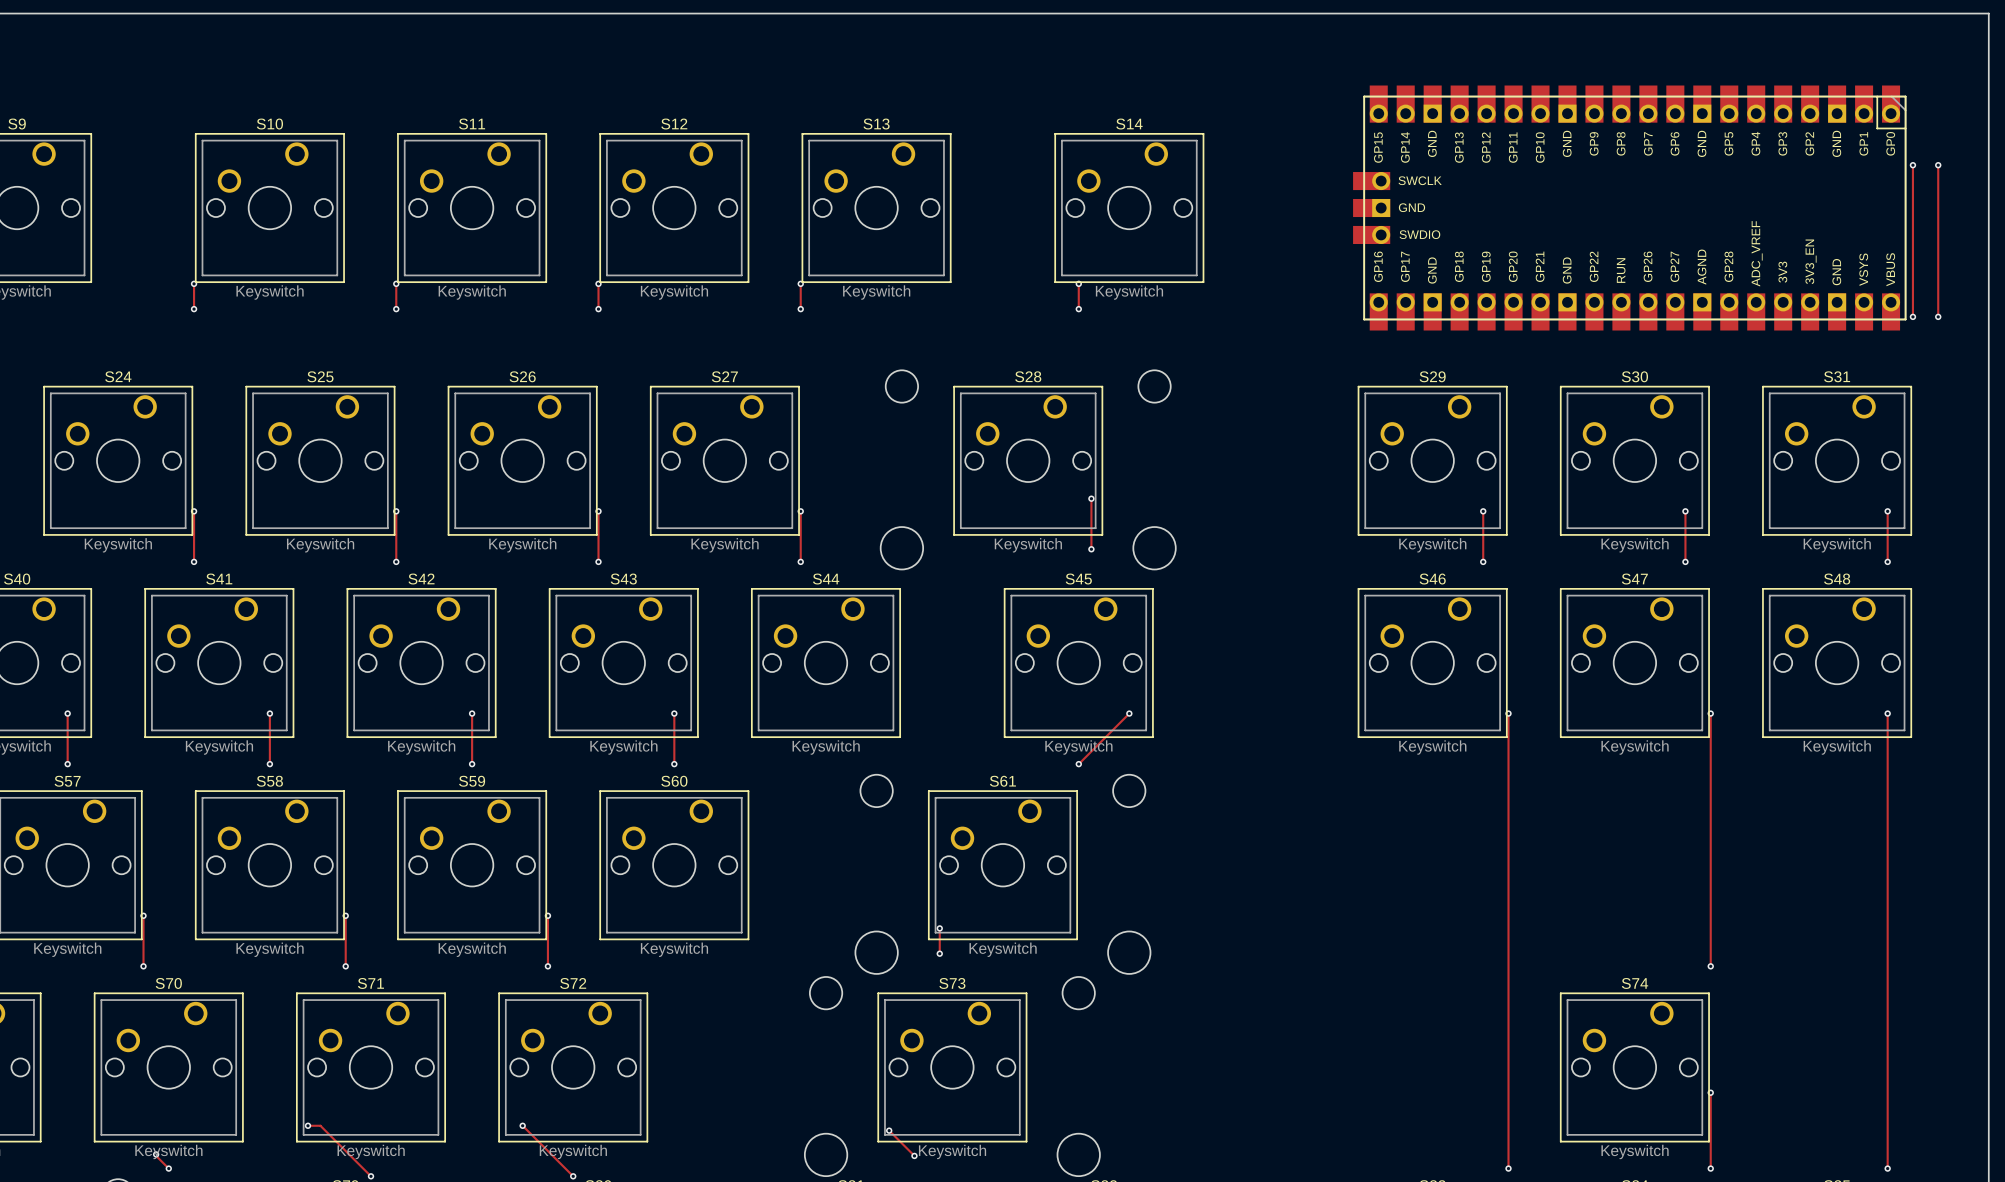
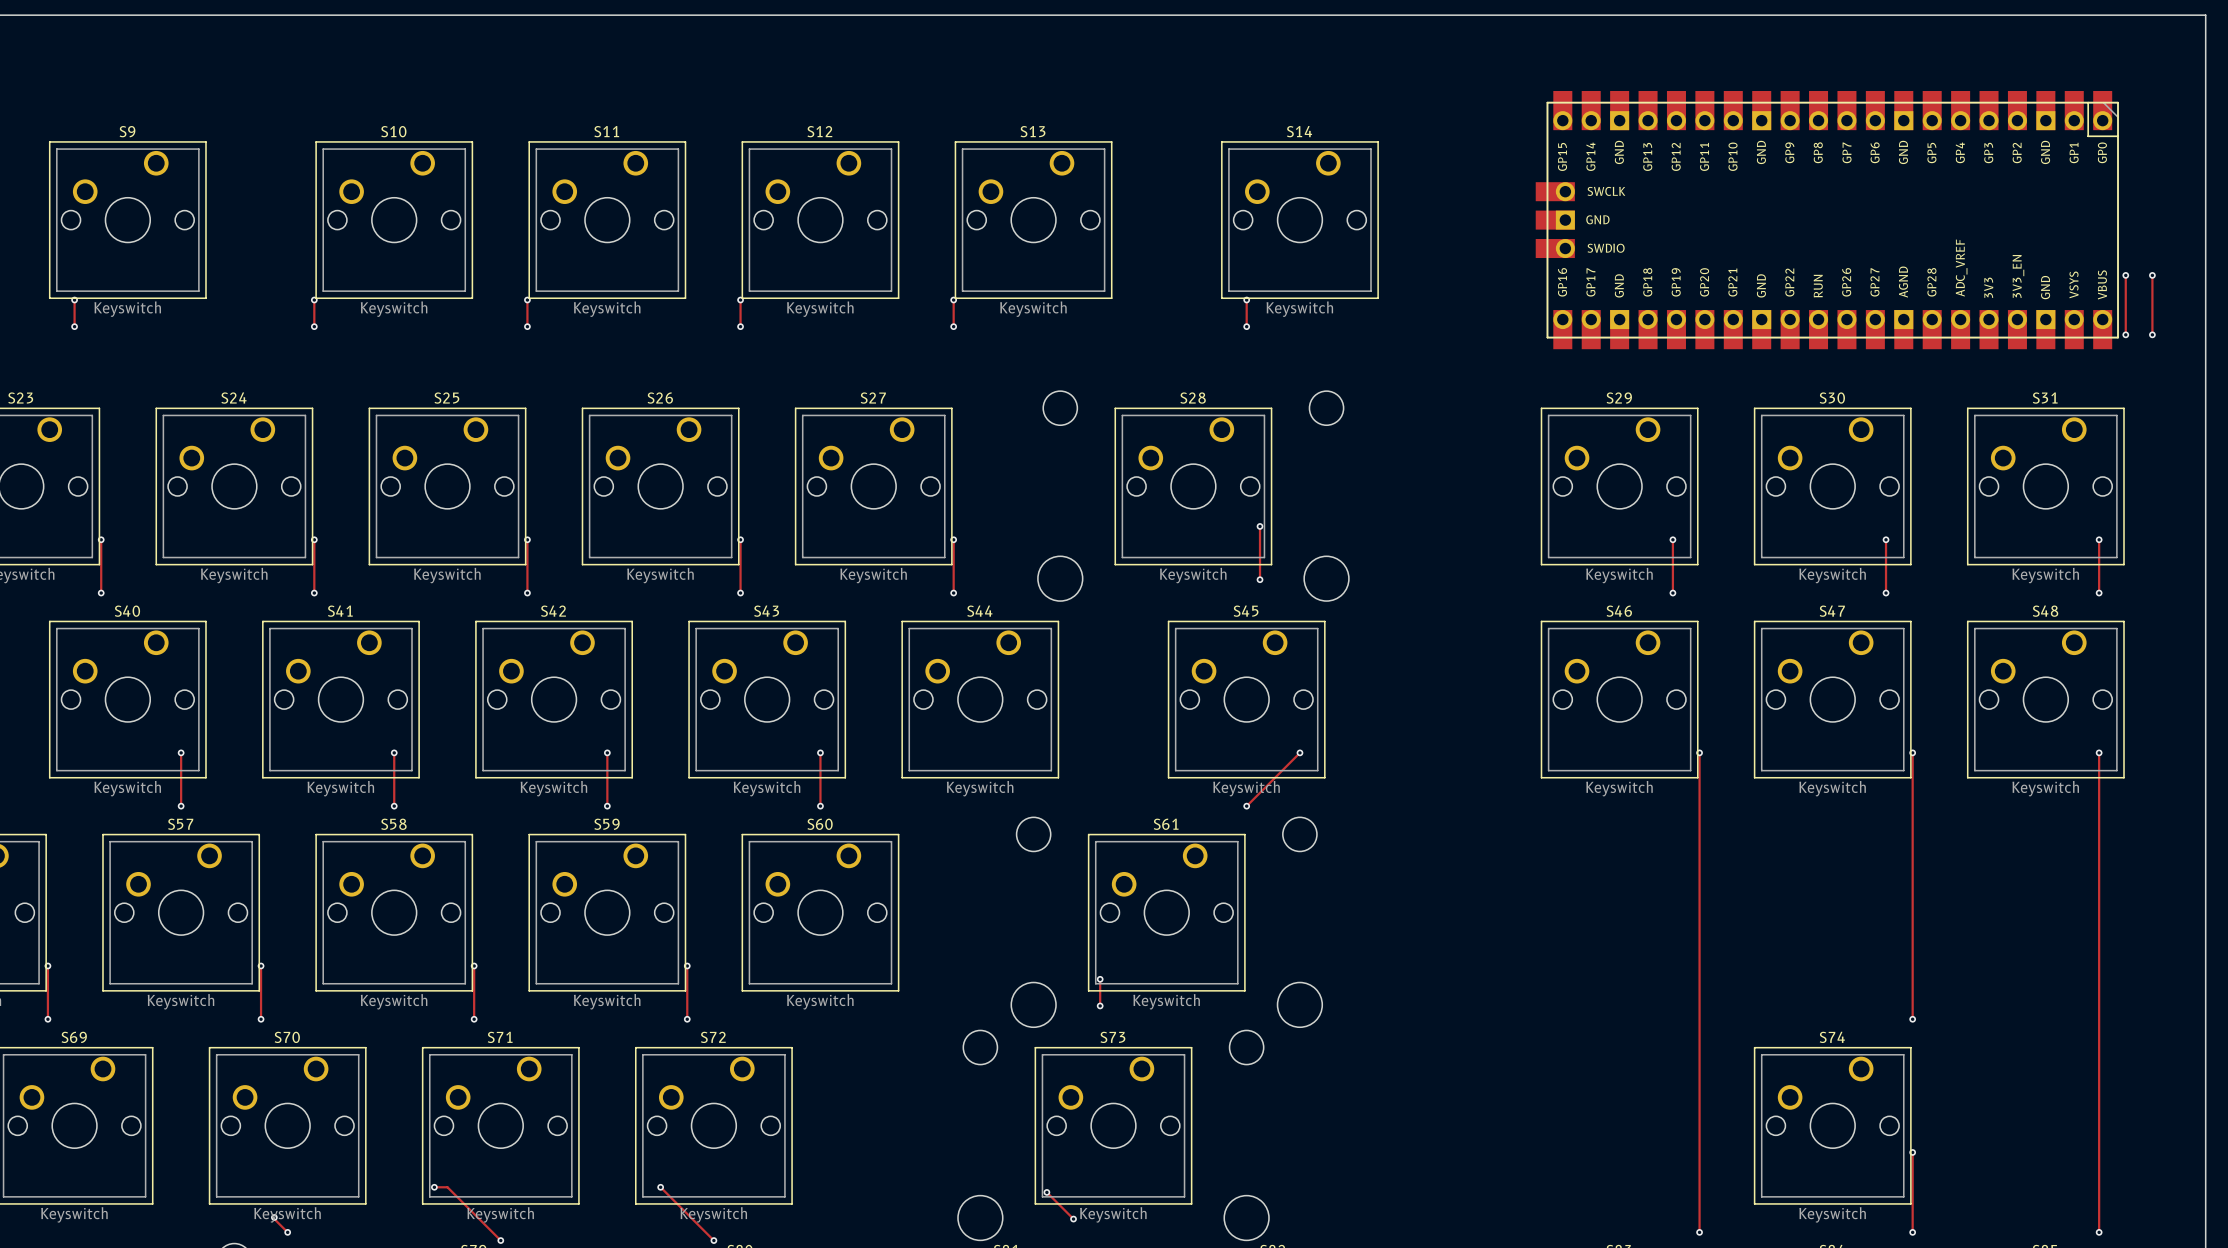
track: (1912, 165) (1912, 260) -> none
via: (1912, 165) -> none
track: (1938, 165) (1938, 260) -> none
via: (1938, 165) -> none
via: none -> (2125, 275)
via: none -> (2152, 275)

